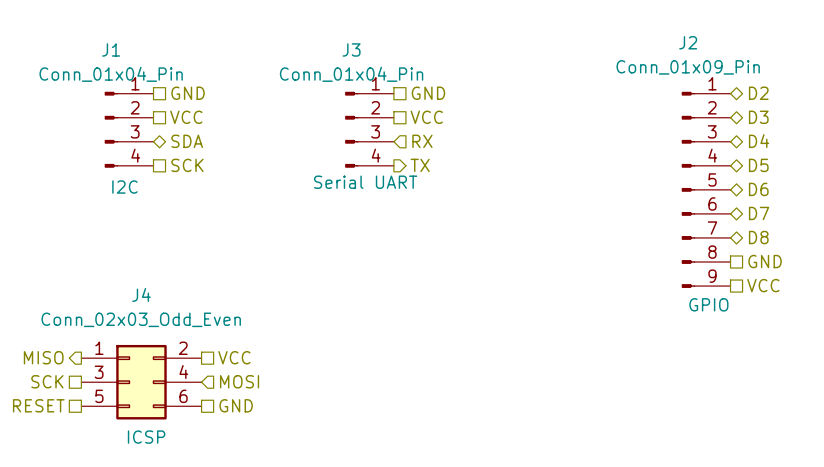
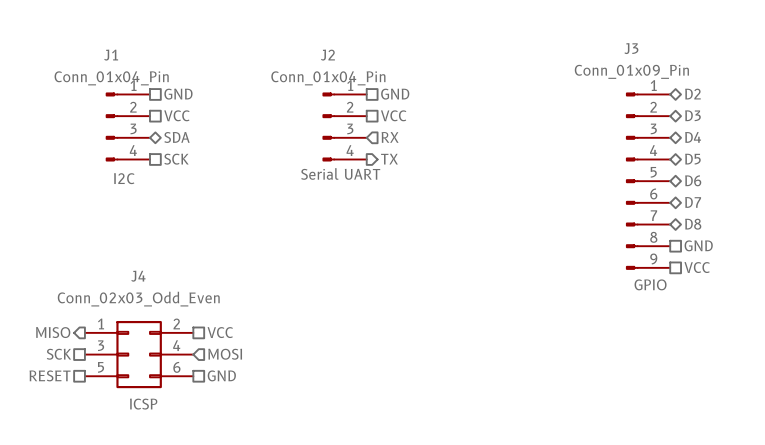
J2 name: J2 (688, 42) -> J3 (631, 48)
J3 name: J3 (351, 49) -> J2 (327, 55)

